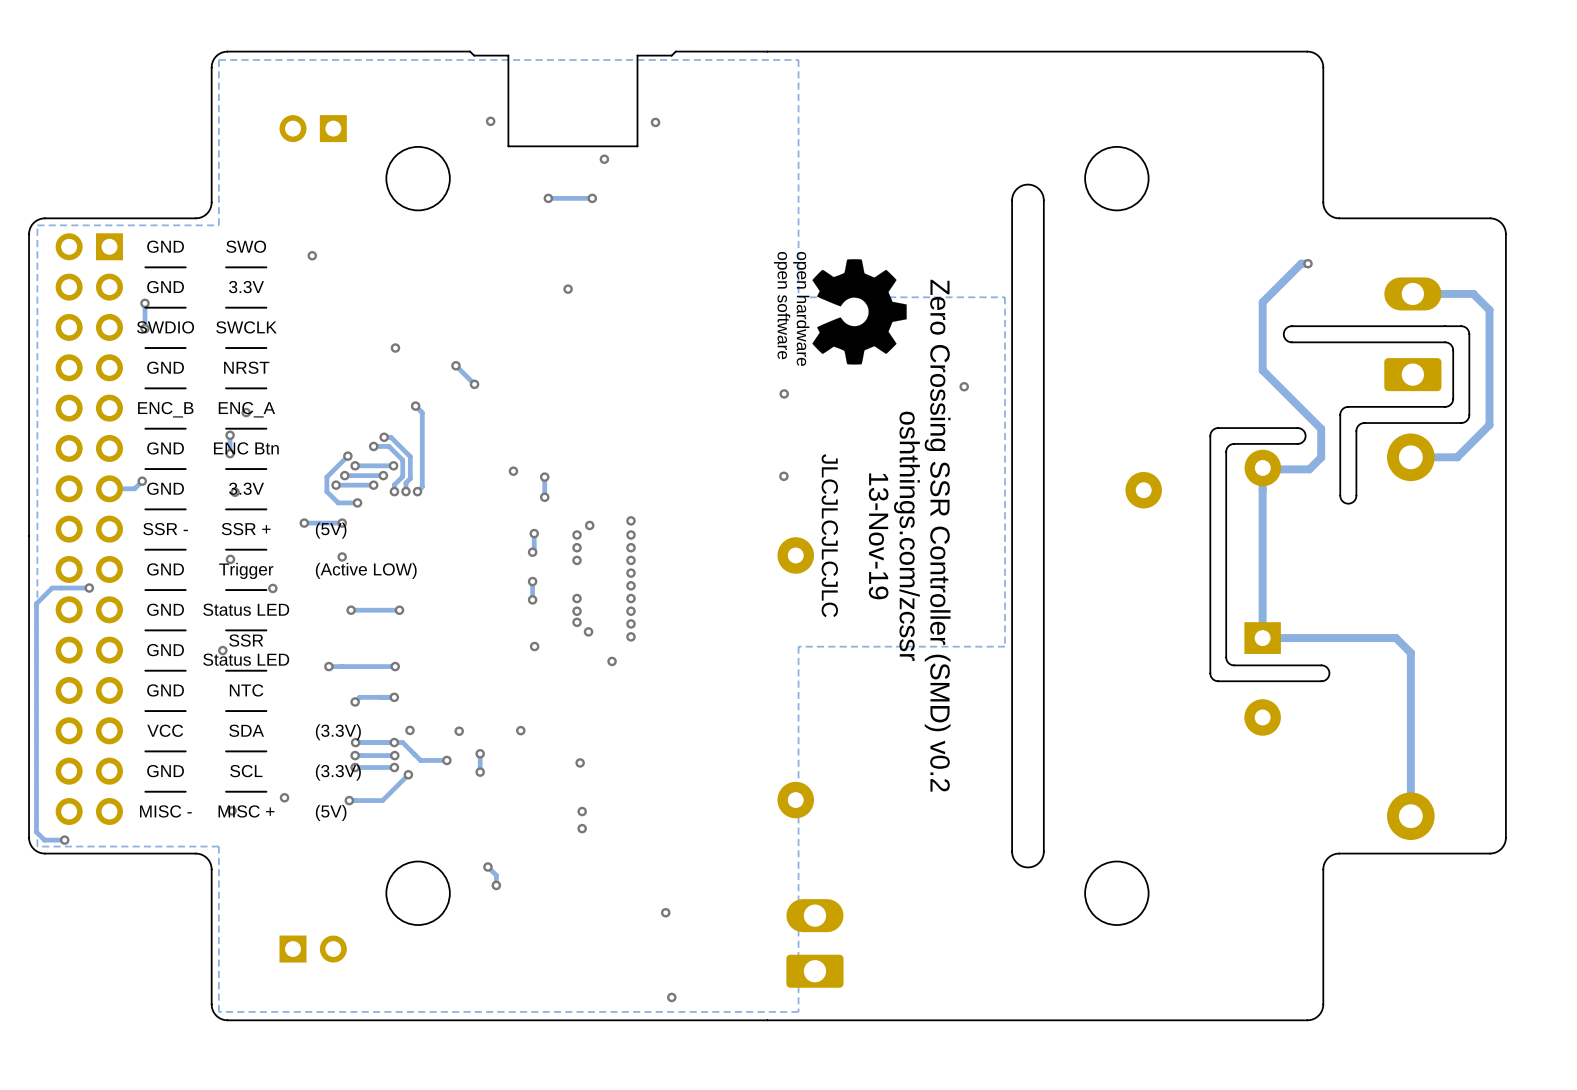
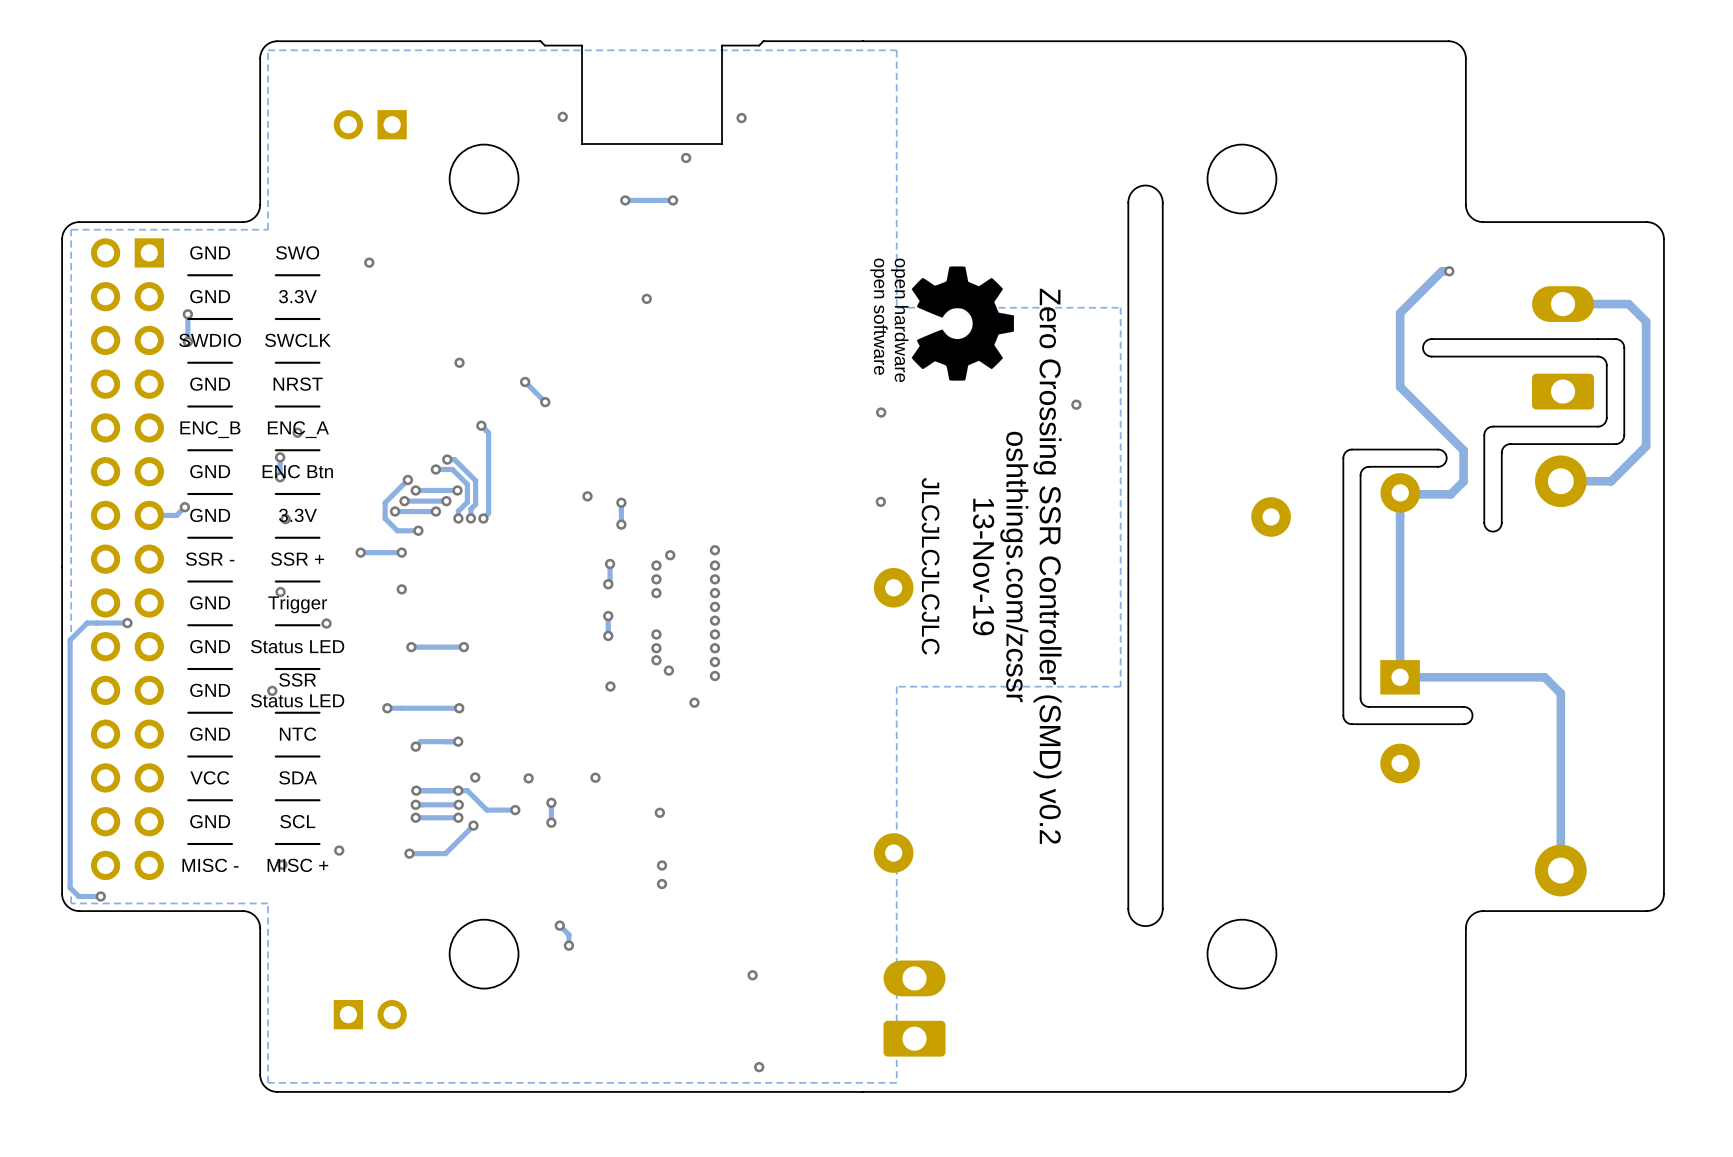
text: (5V) (331, 530) -> none
text: (Active LOW) (366, 570) -> none
text: (3.3V) (338, 732) -> none
text: (3.3V) (338, 772) -> none
text: (5V) (331, 812) -> none

